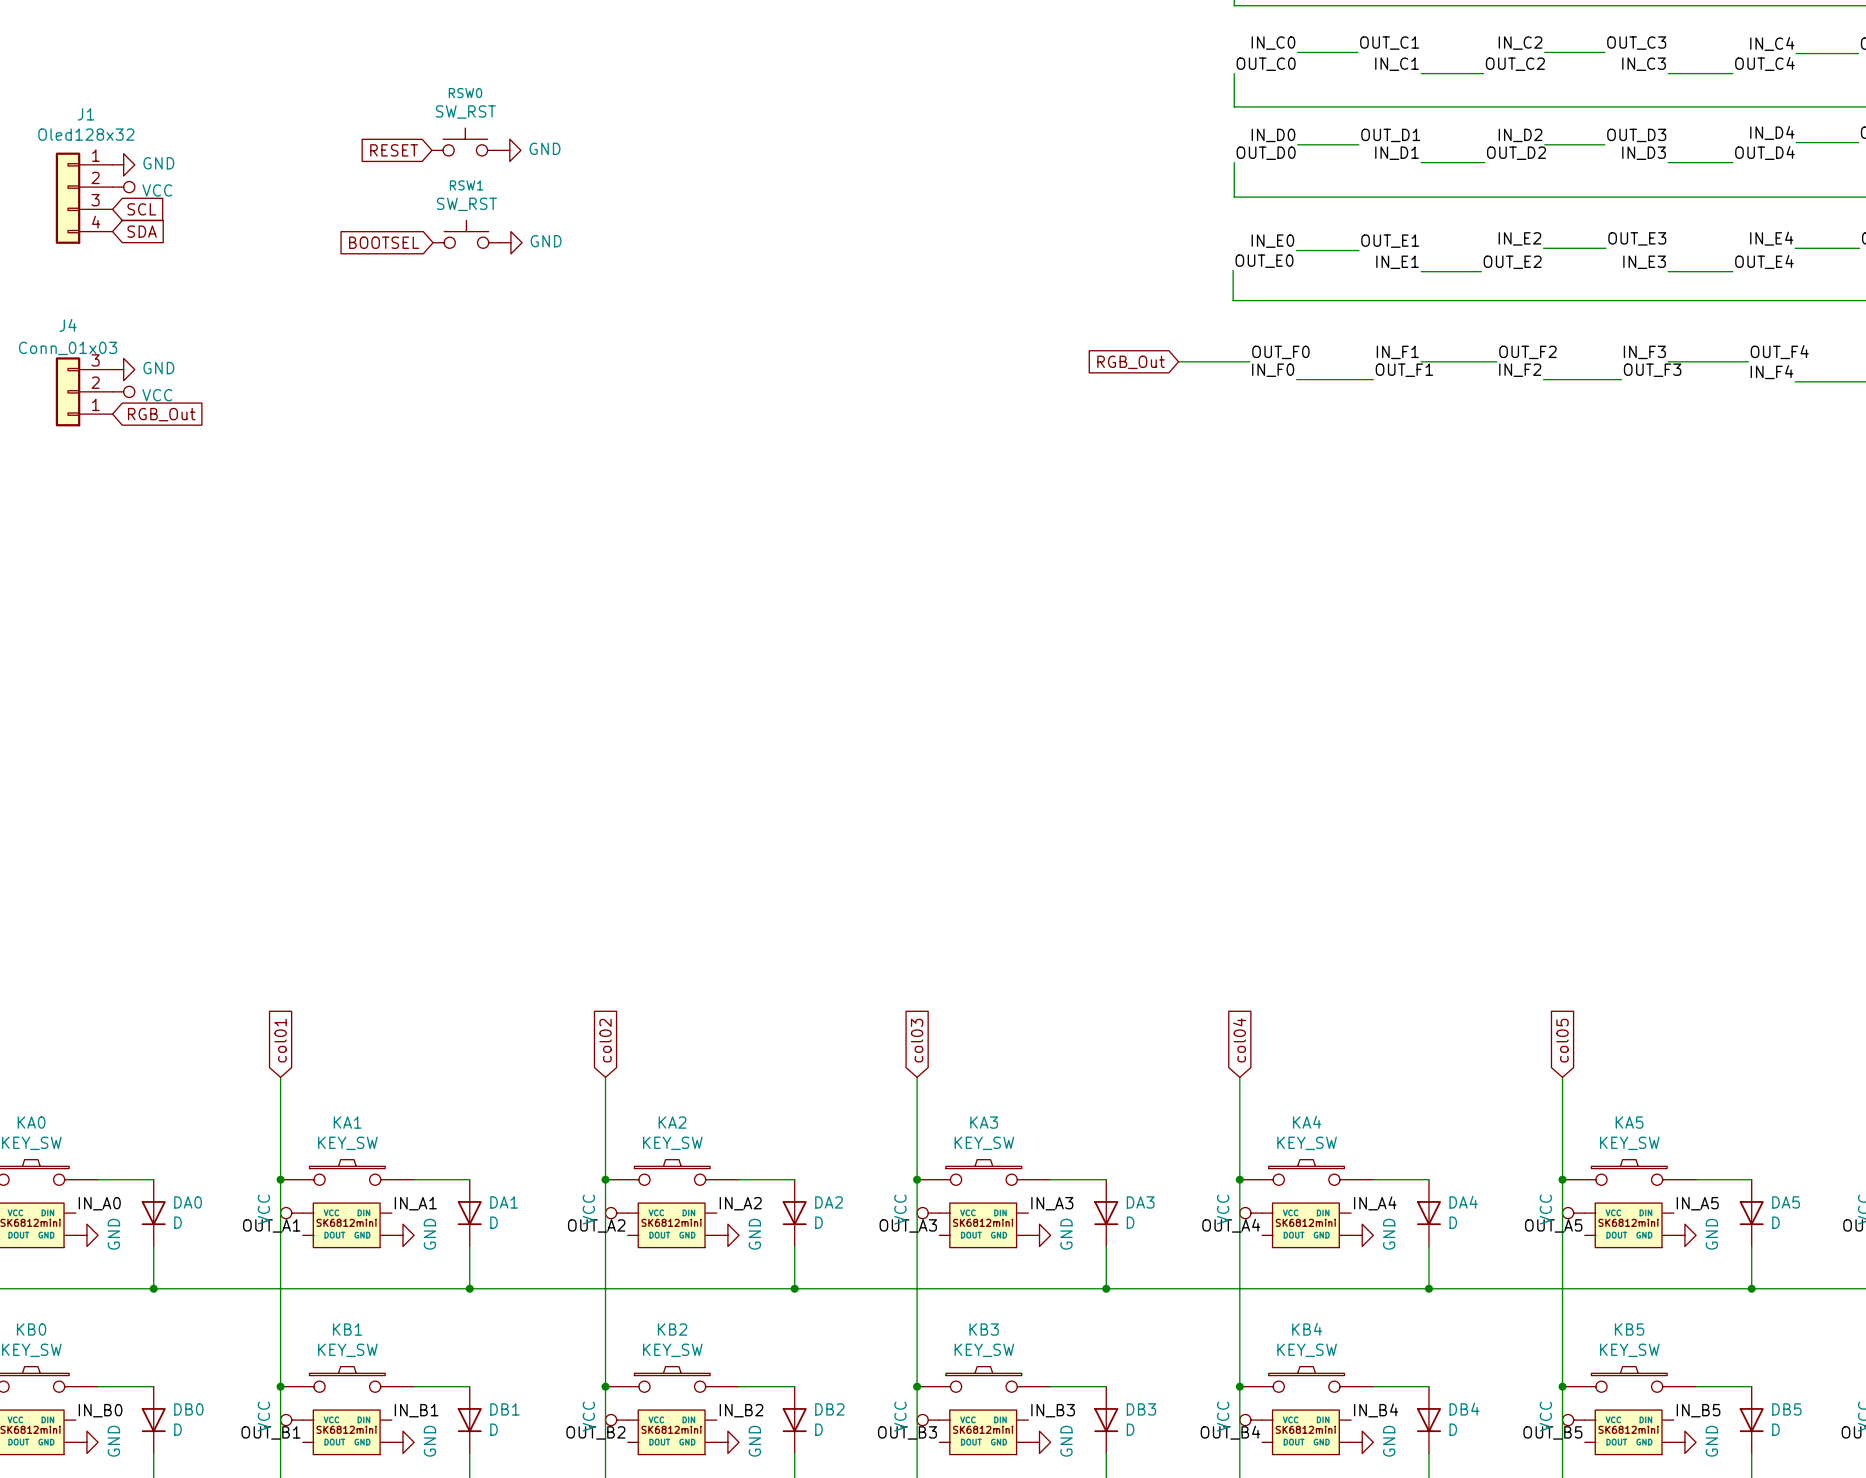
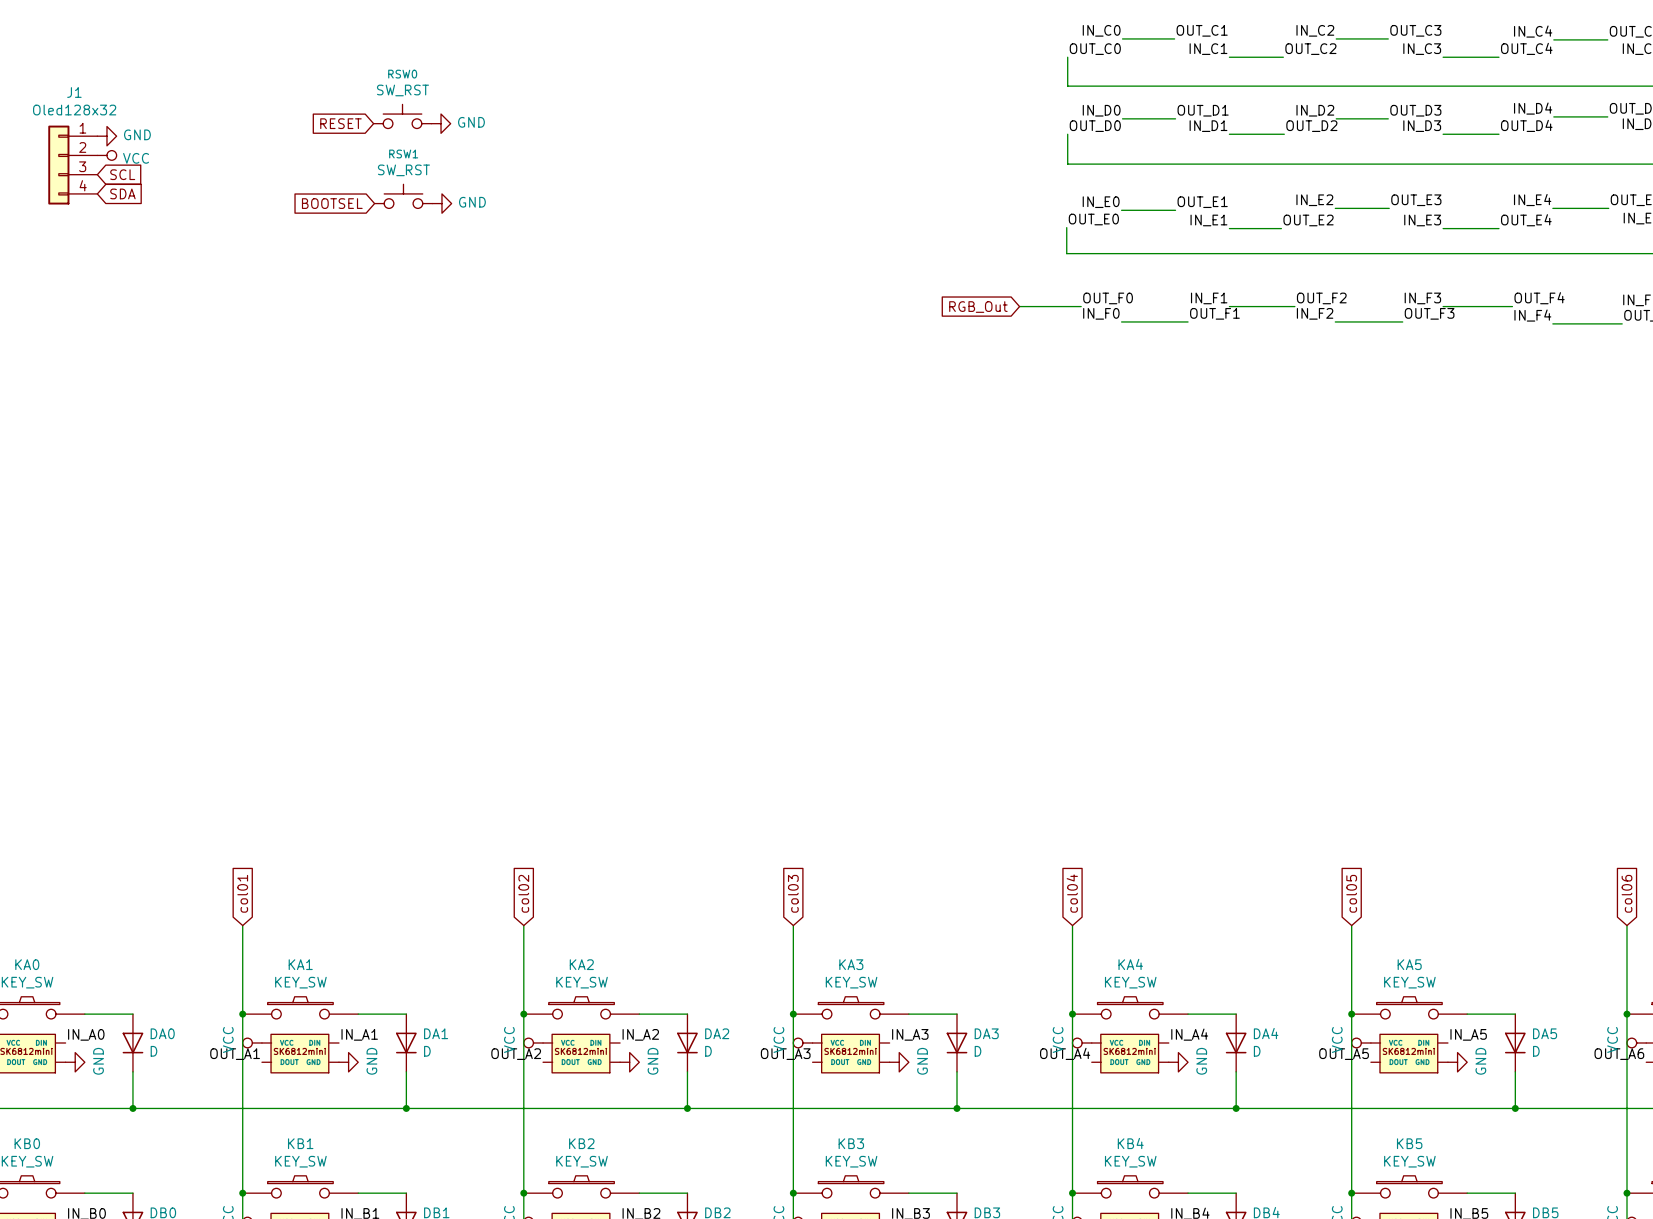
power symbol: GND (123, 369) -> none
J4: Conn_01x03 (84, 391) -> none
power symbol: VCC (123, 391) -> none
global label: RGB_Out (161, 414) -> none

